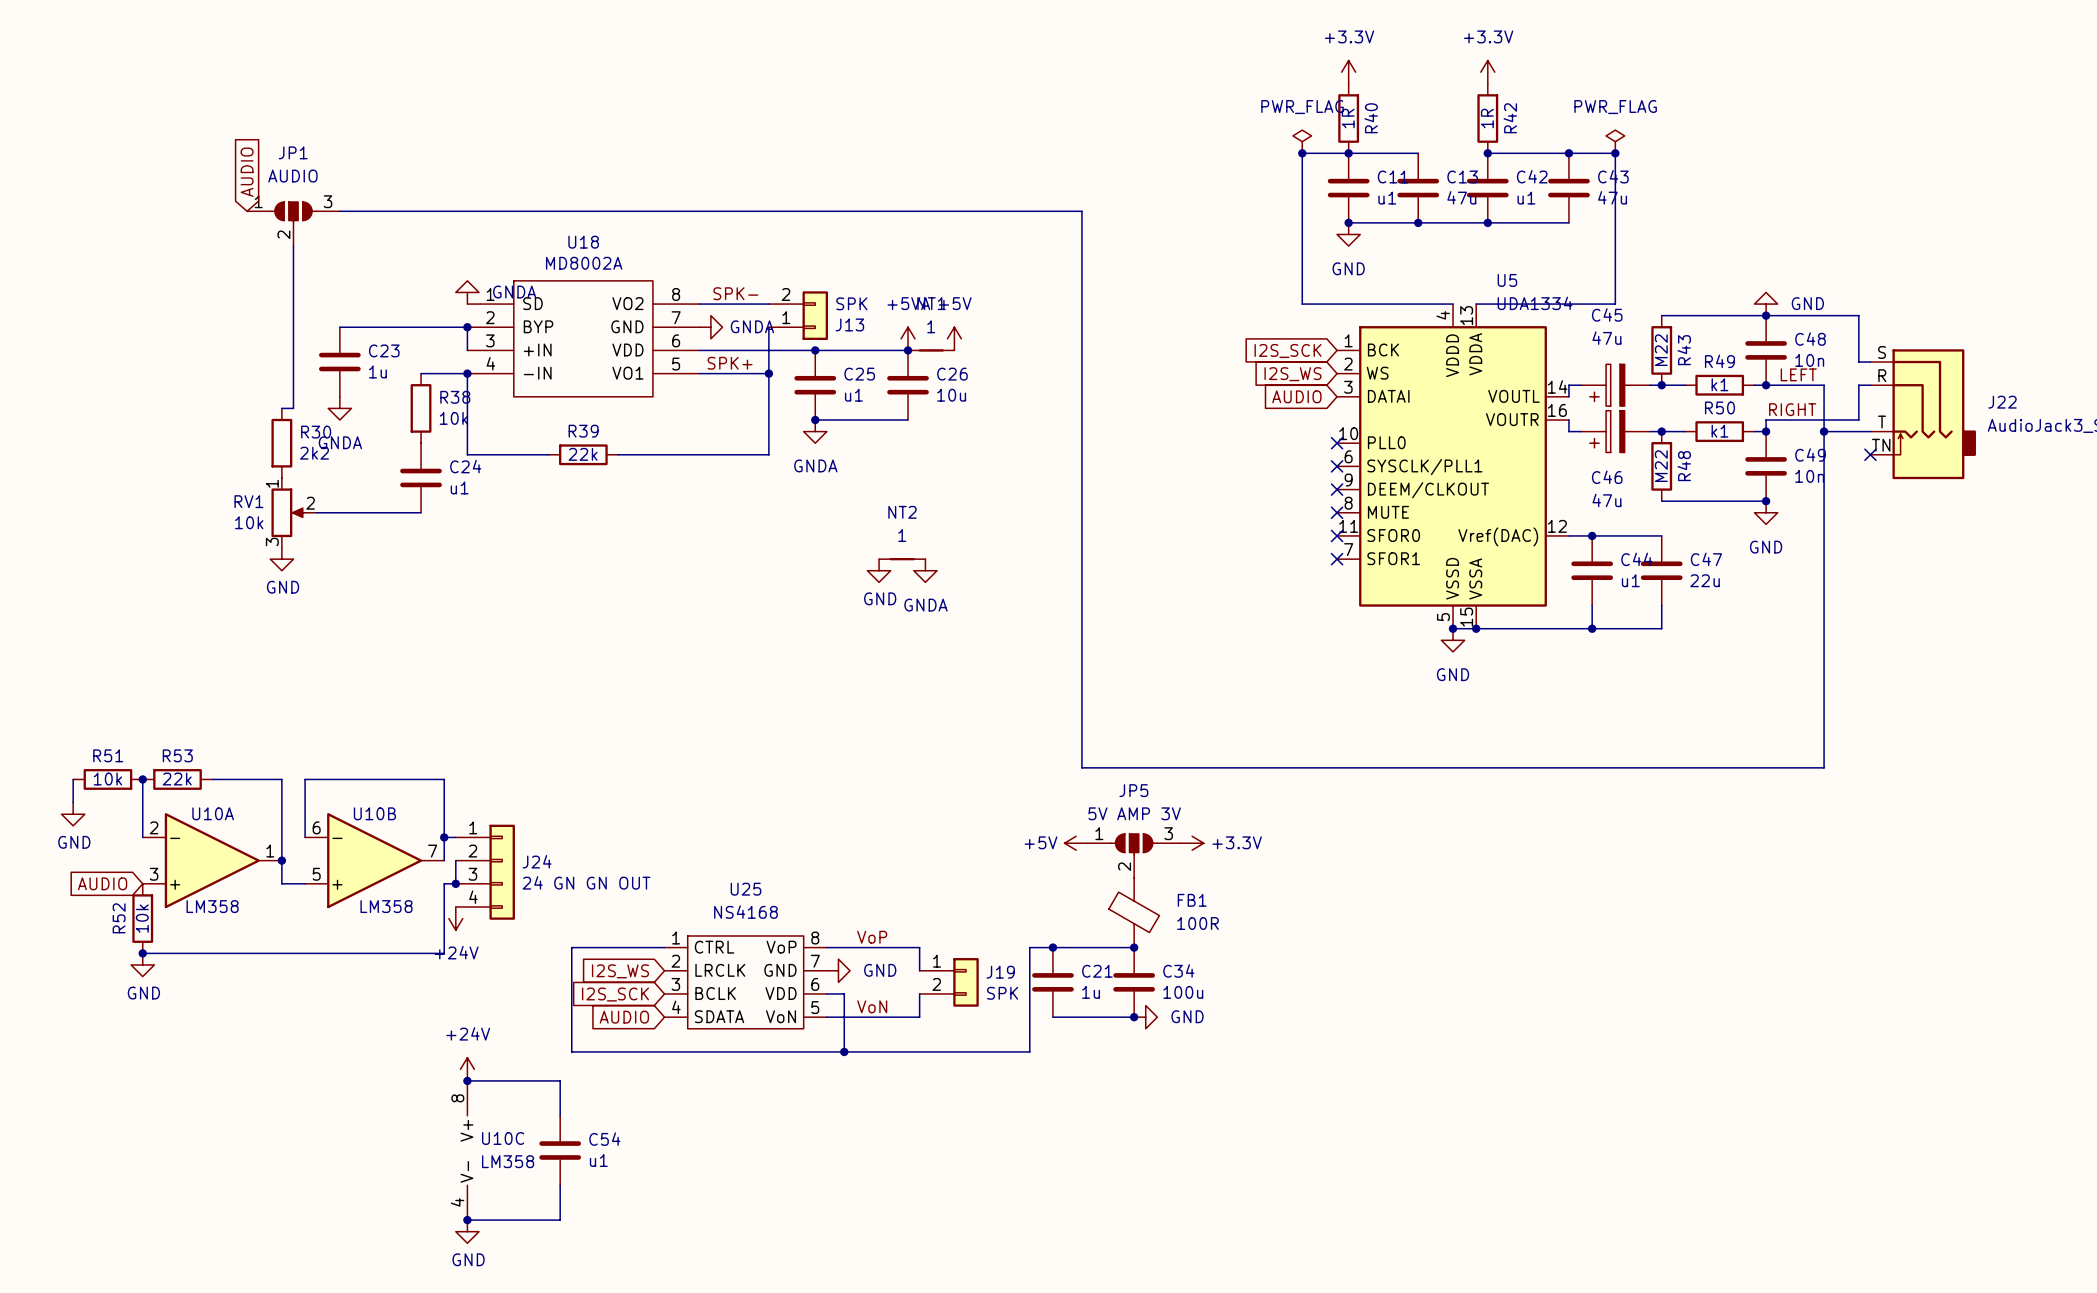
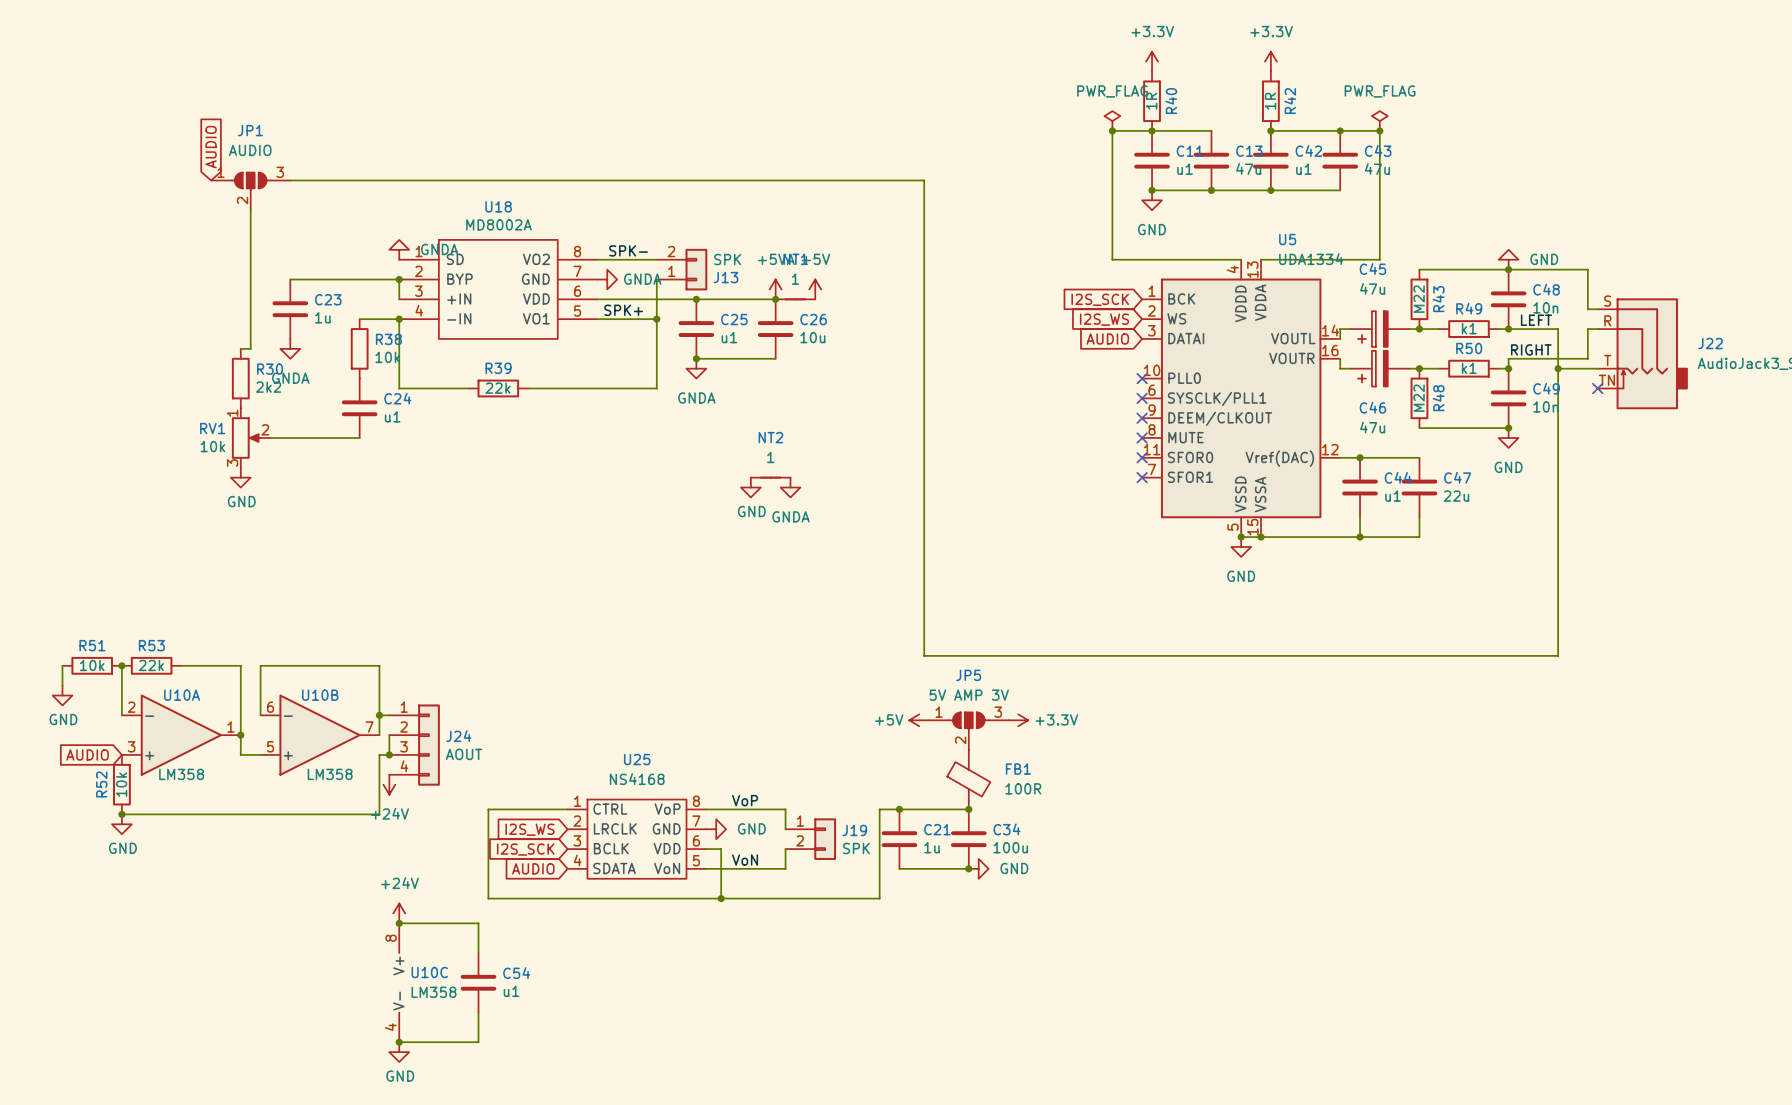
J24 value: 24 GN GN OUT (586, 882) -> AOUT (464, 754)

